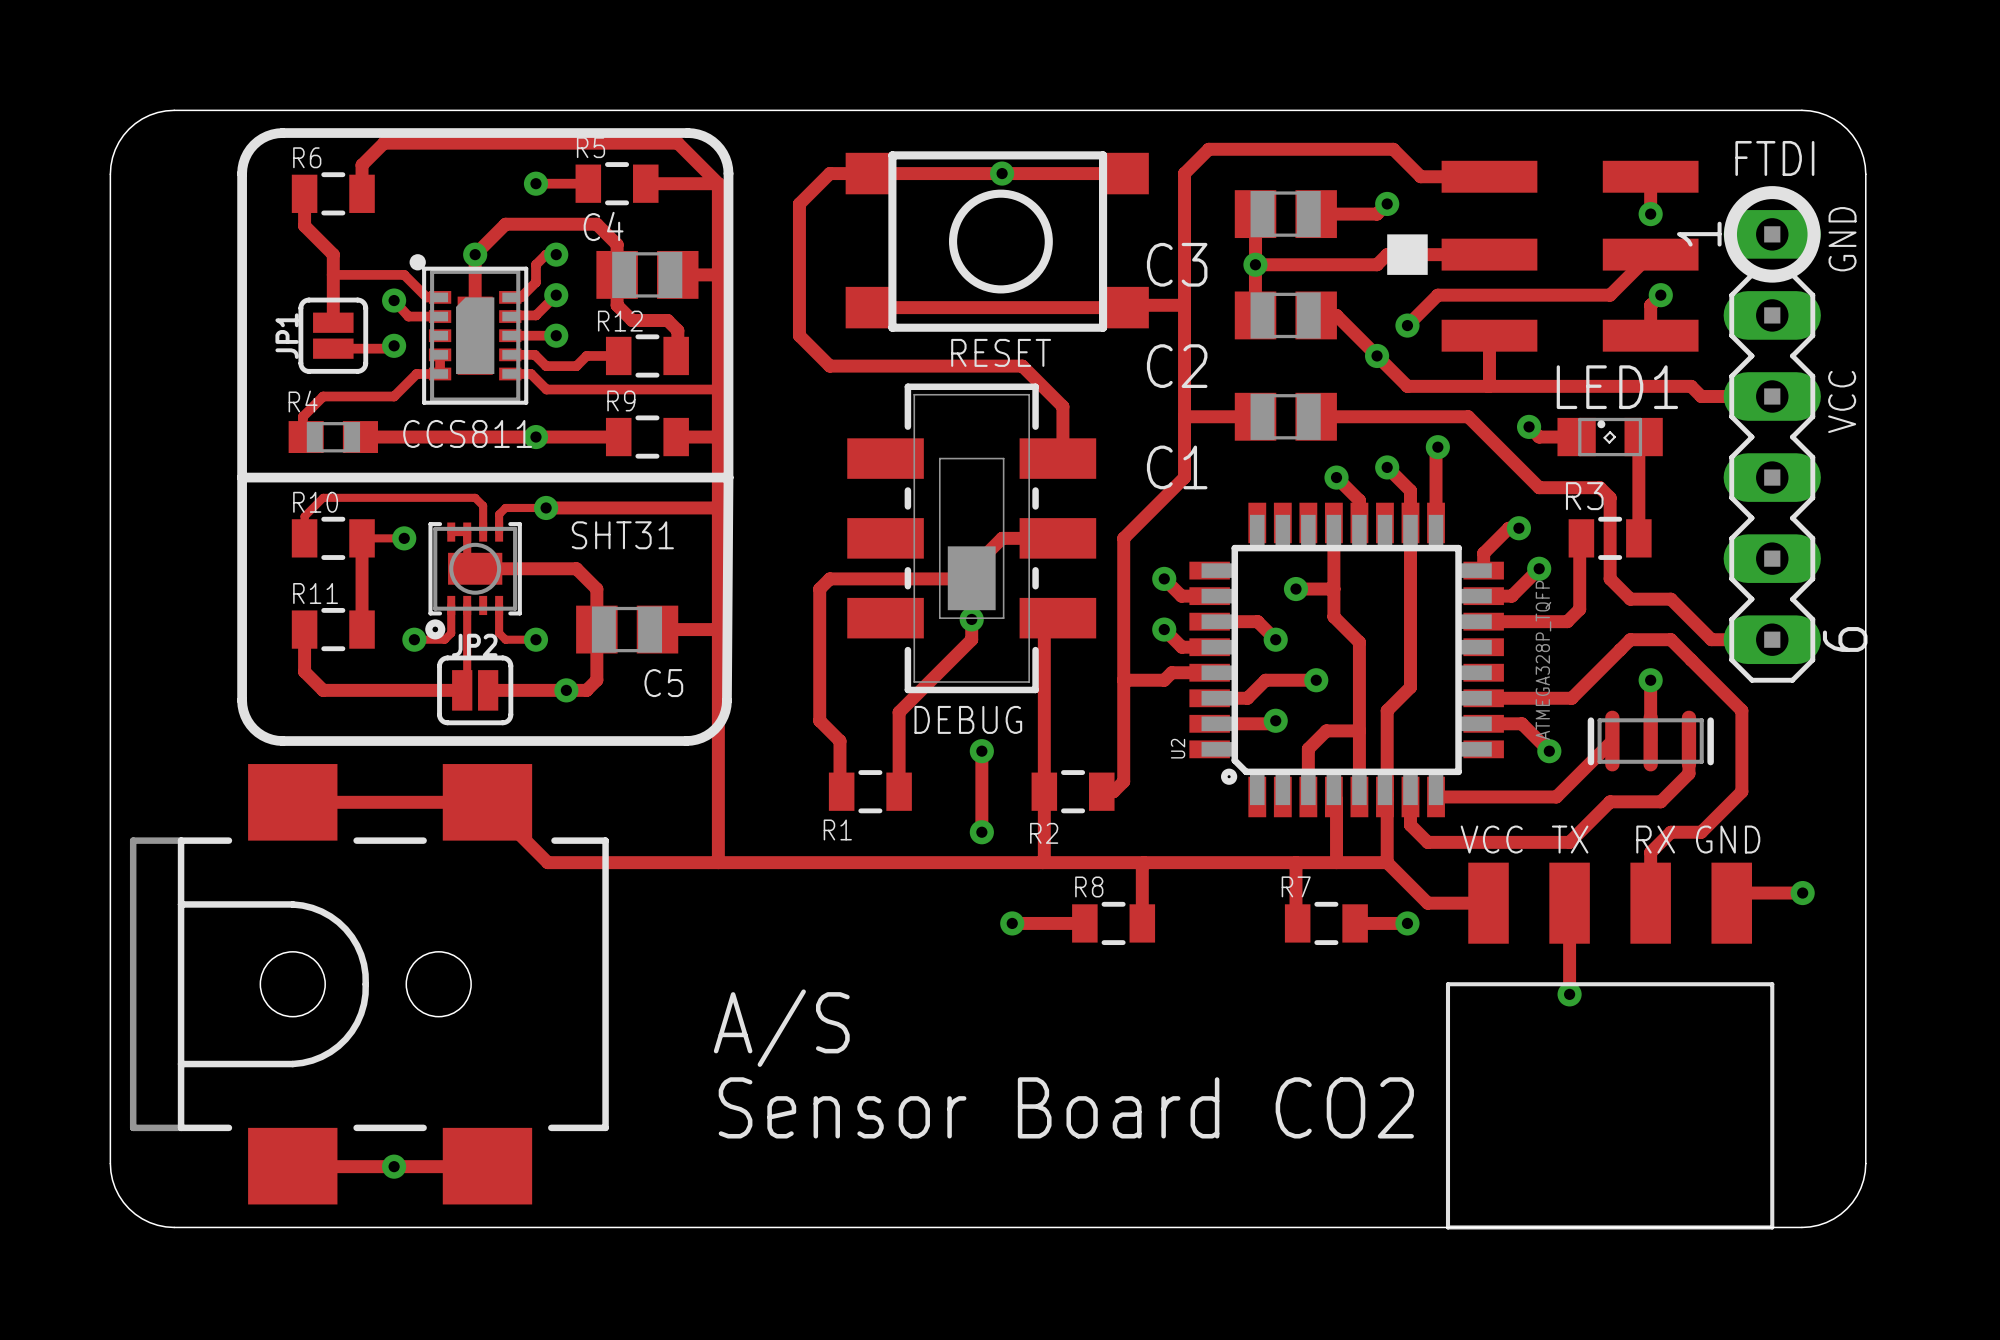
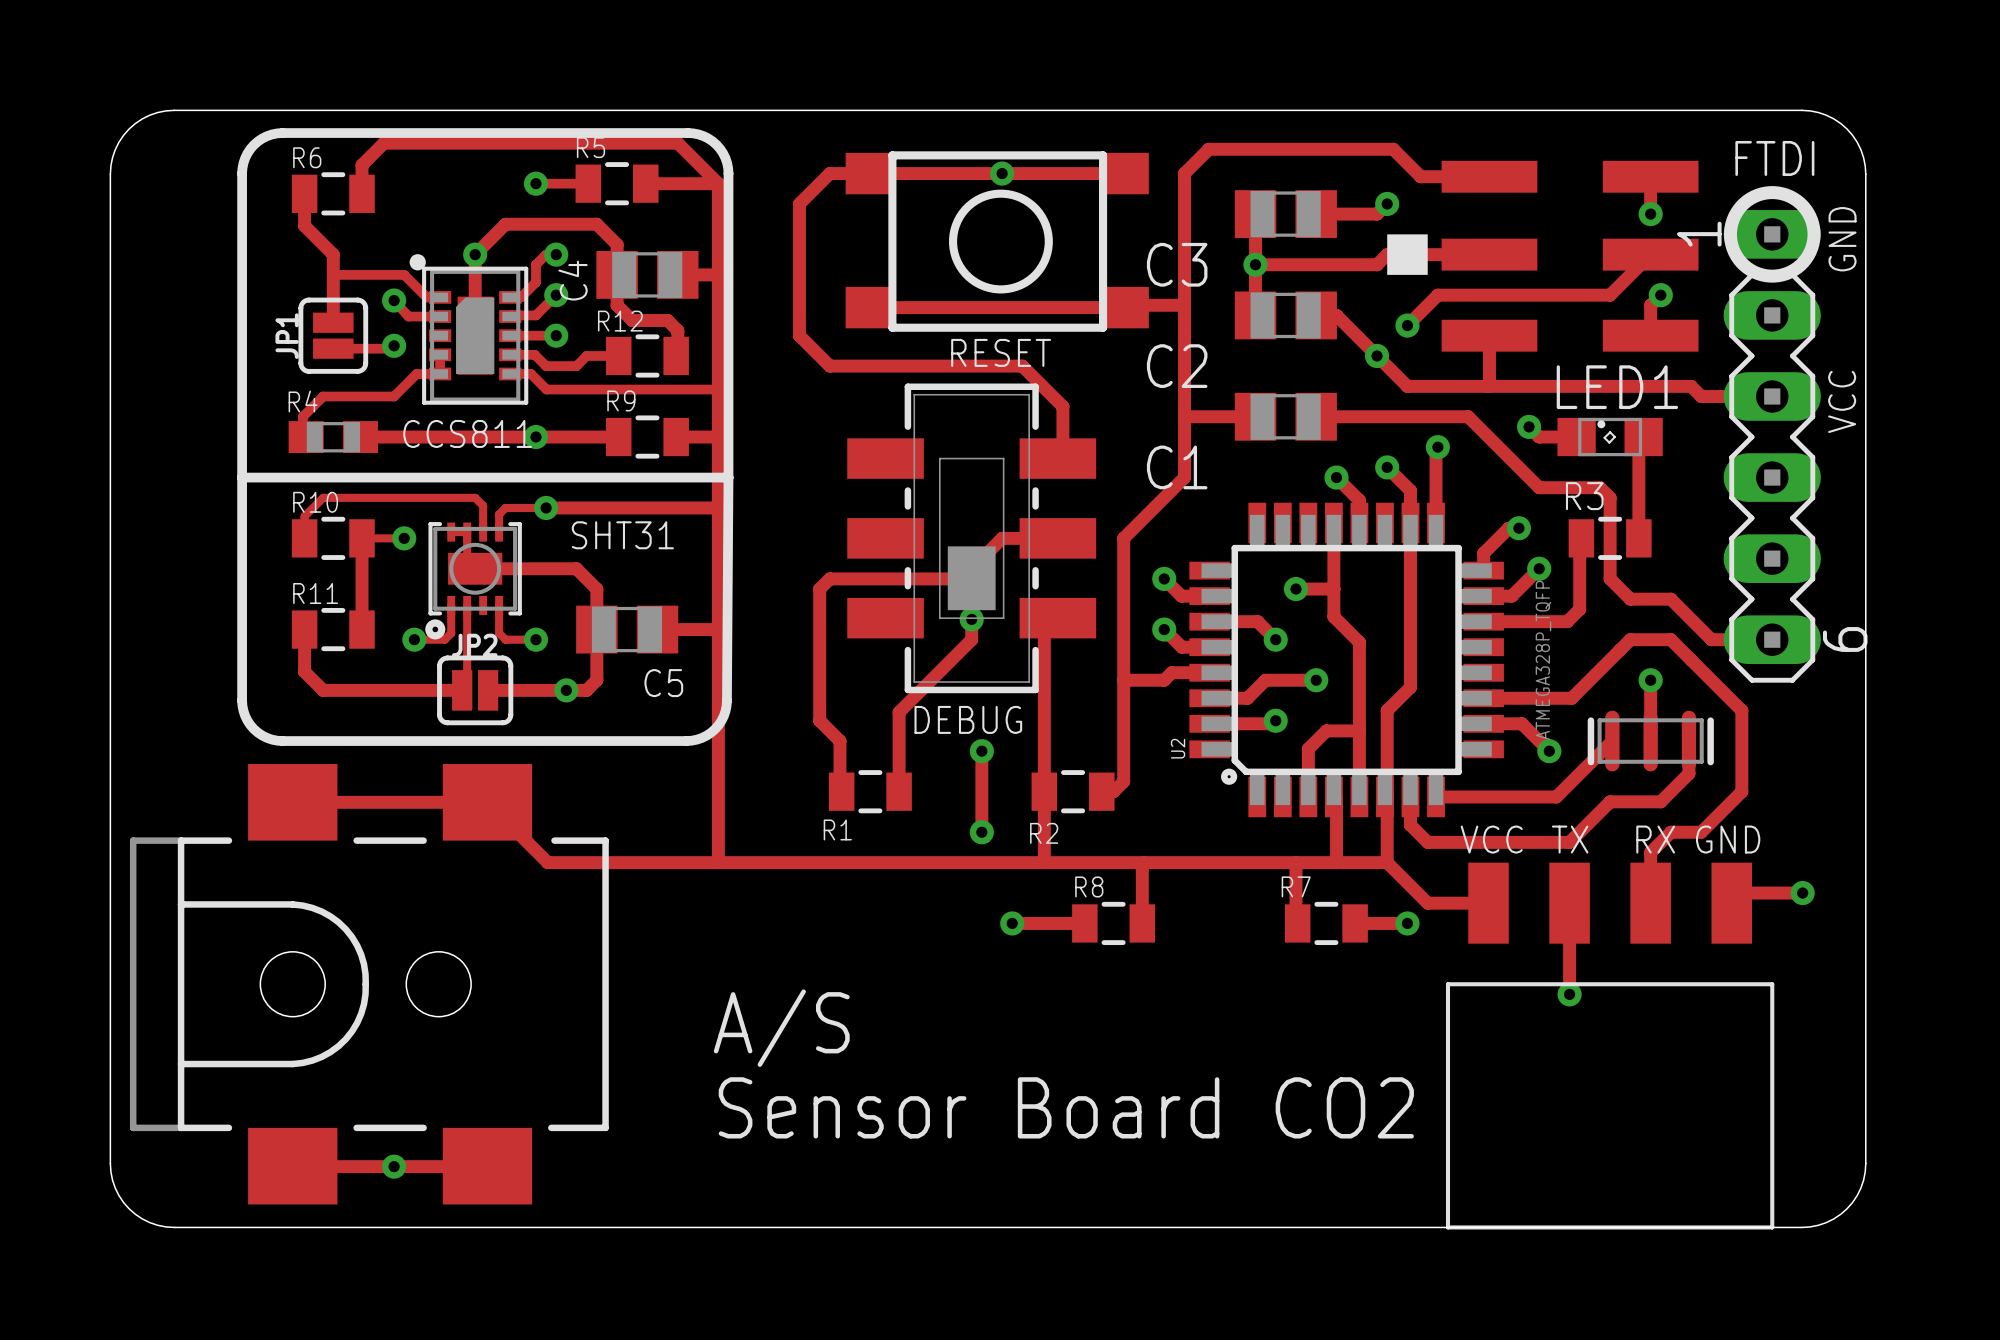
C4 name rotation: 0° (603, 226) -> 90° counterclockwise (573, 280)

